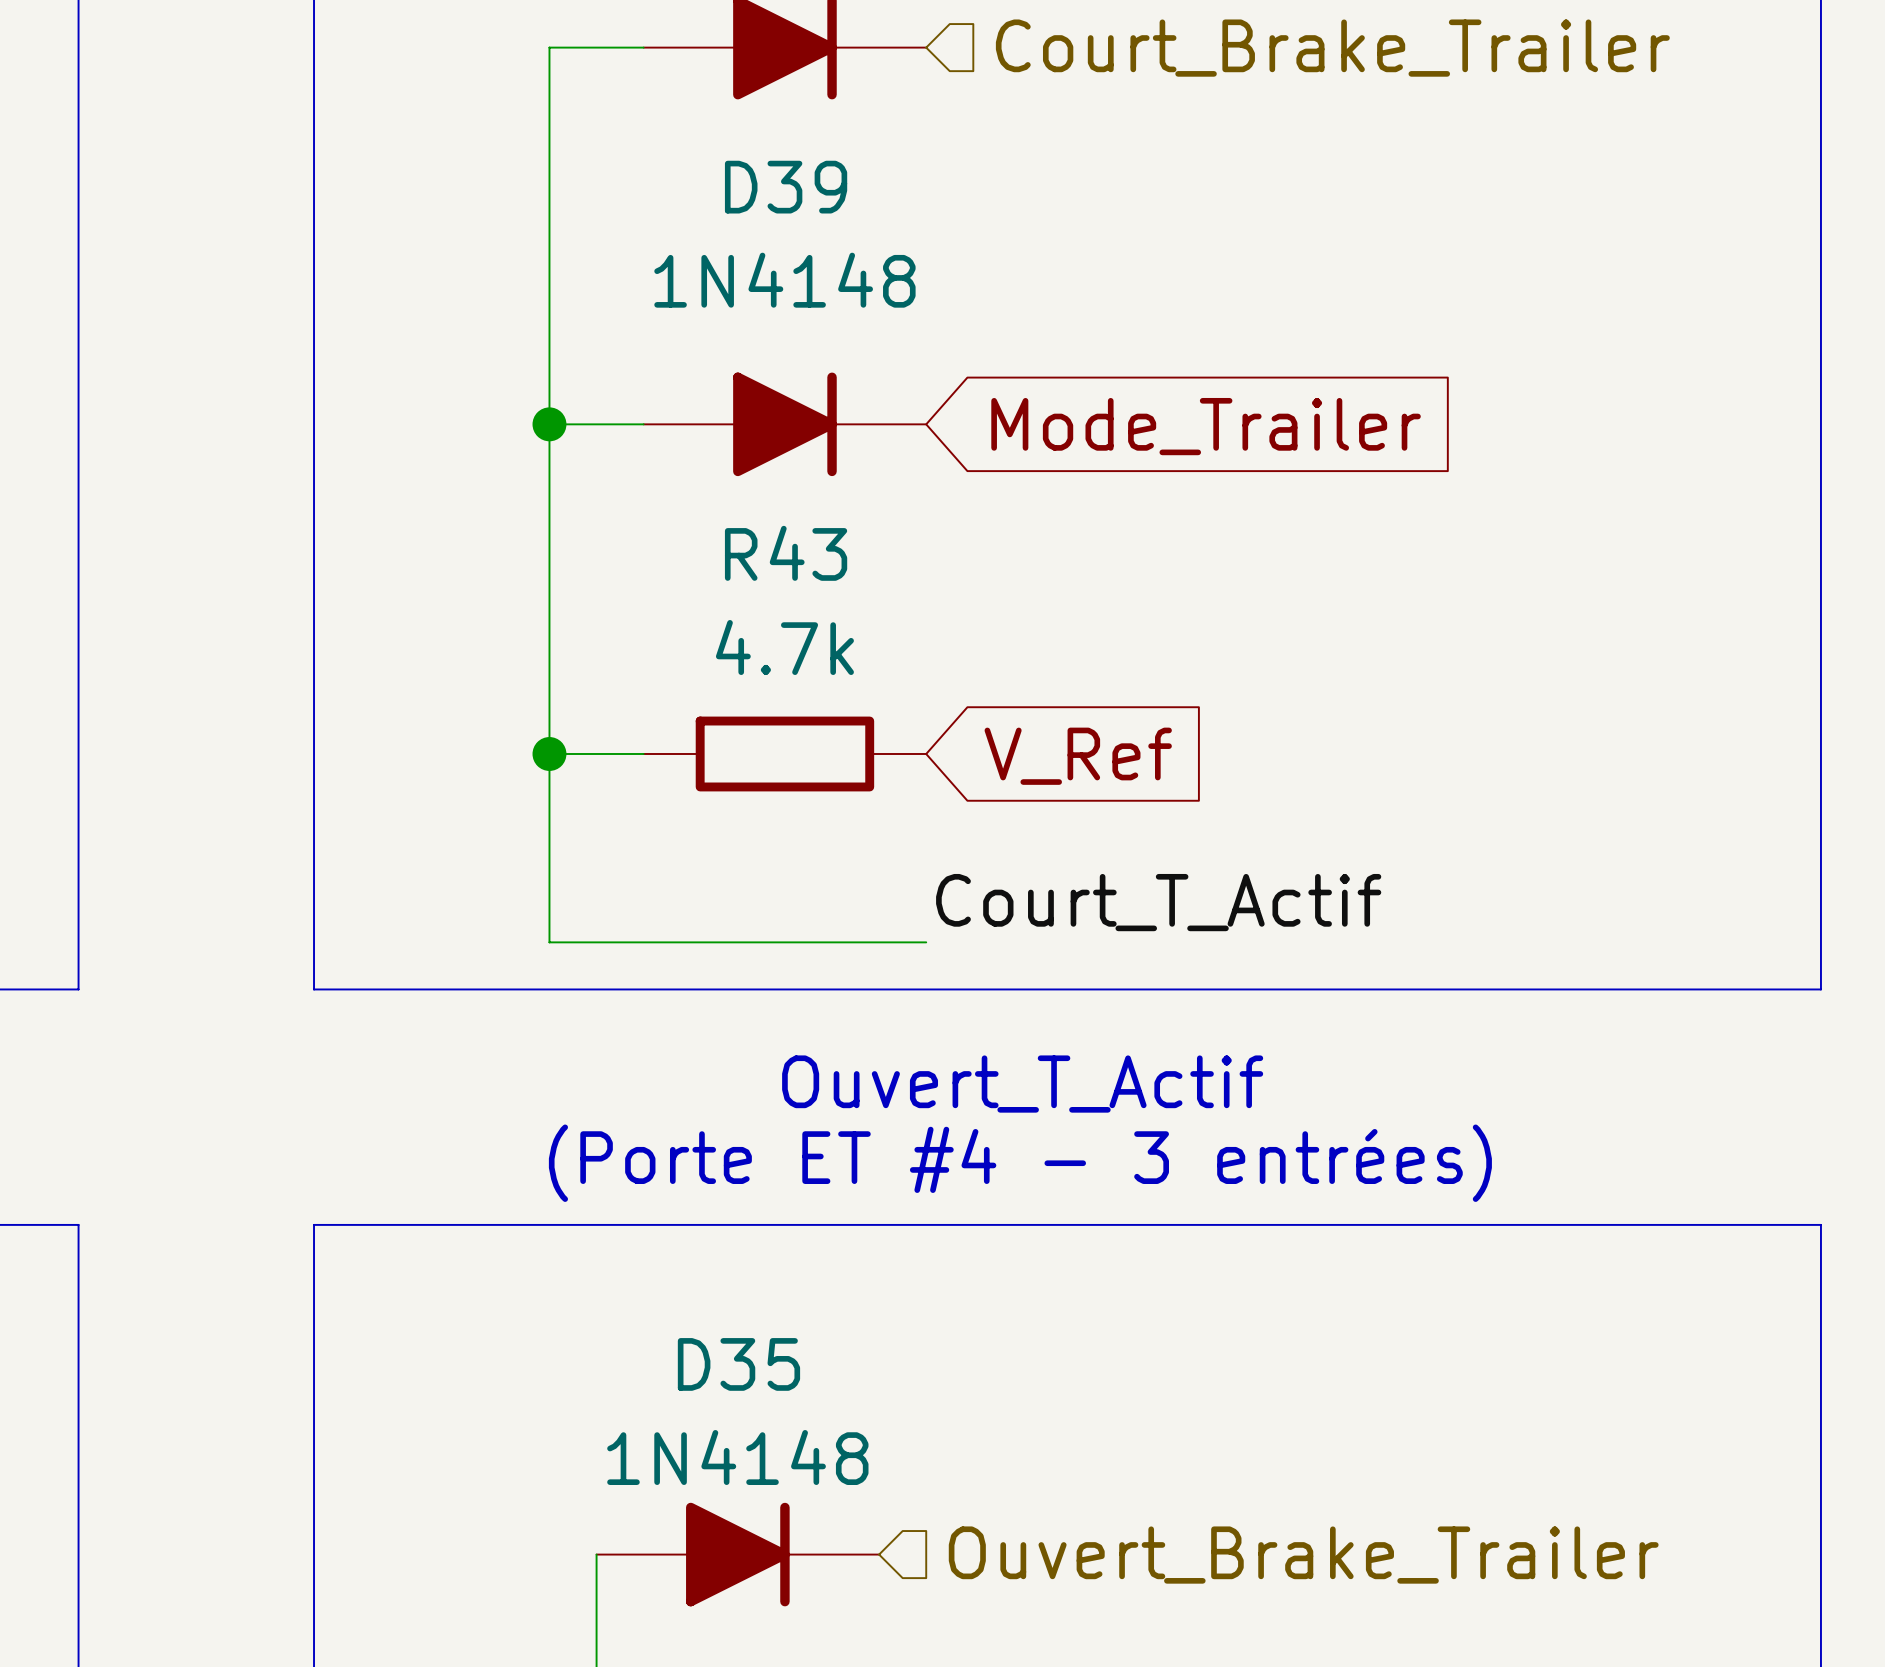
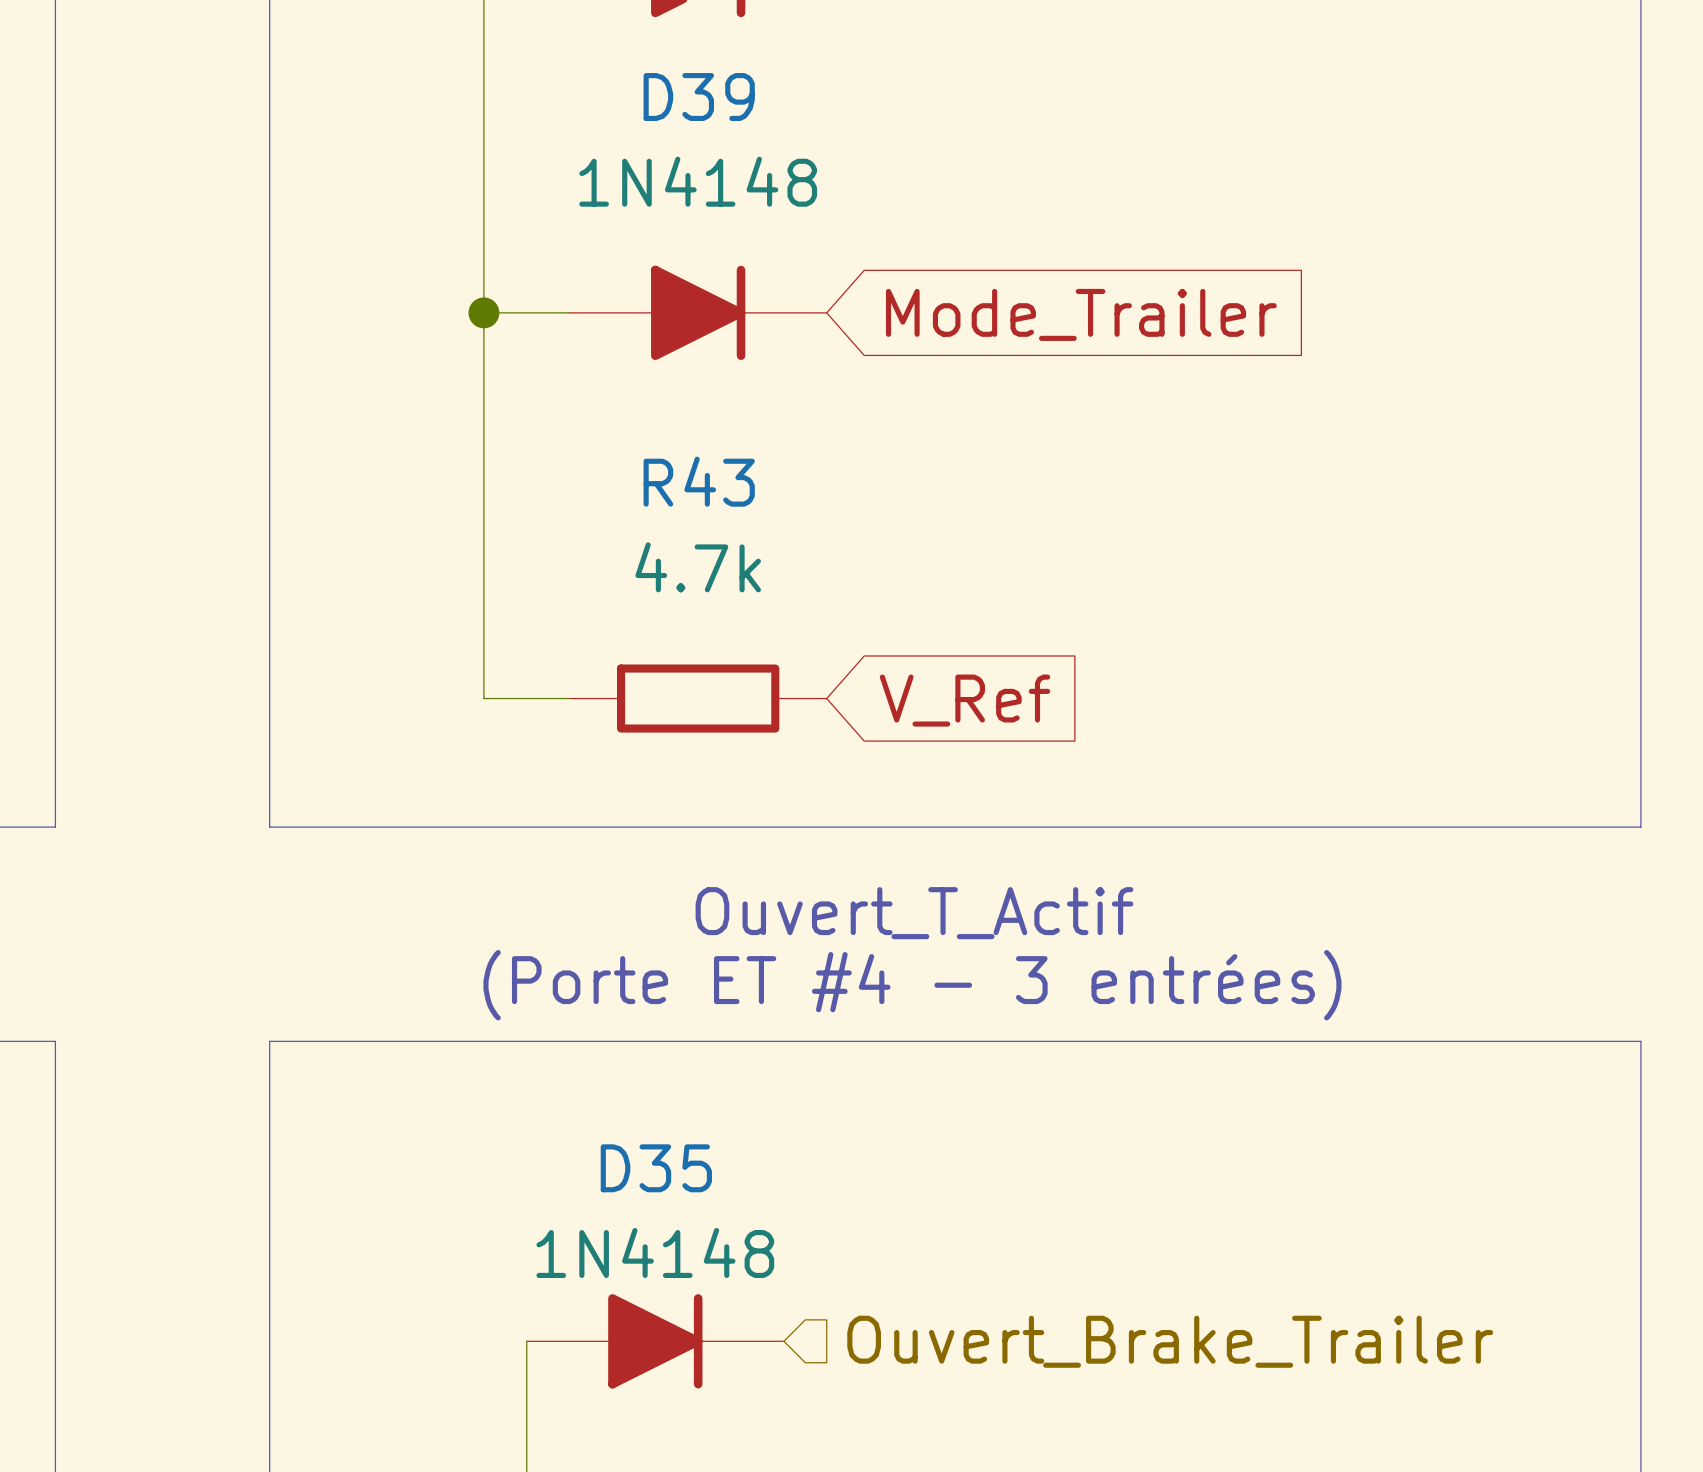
R43 name position: R43 (786, 553) -> R43 (699, 481)
R43 value position: 4.7k (784, 647) -> 4.7k (698, 567)
wire: (549, 753) (643, 753) -> none
junction: (549, 753) -> none
R43 position: (784, 753) -> (698, 698)
global label position: V_Ref (1078, 756) -> V_Ref (965, 700)
wire: (549, 848) (549, 942) (926, 942) -> (483, 698) (569, 698)
label: Court_T_Actif (1158, 902) -> none

